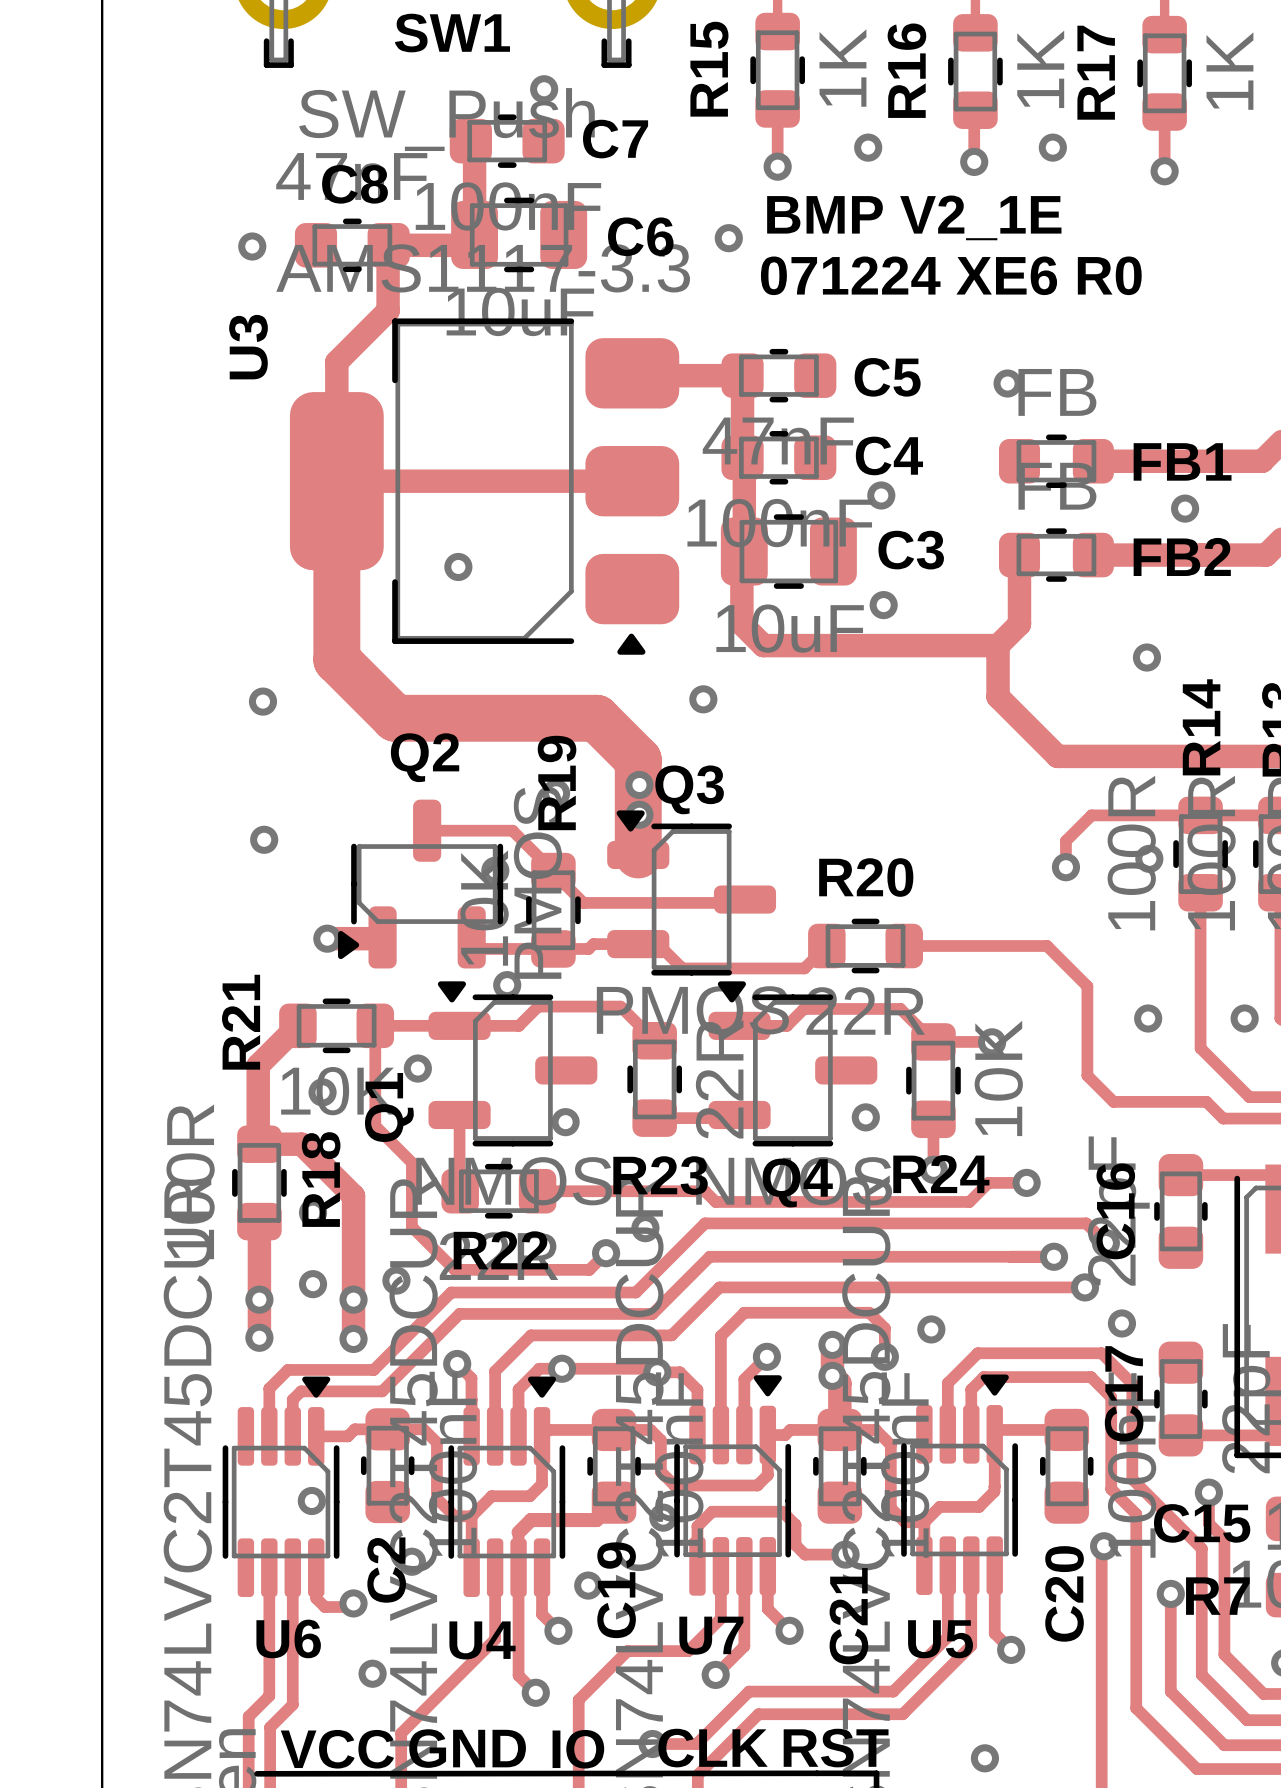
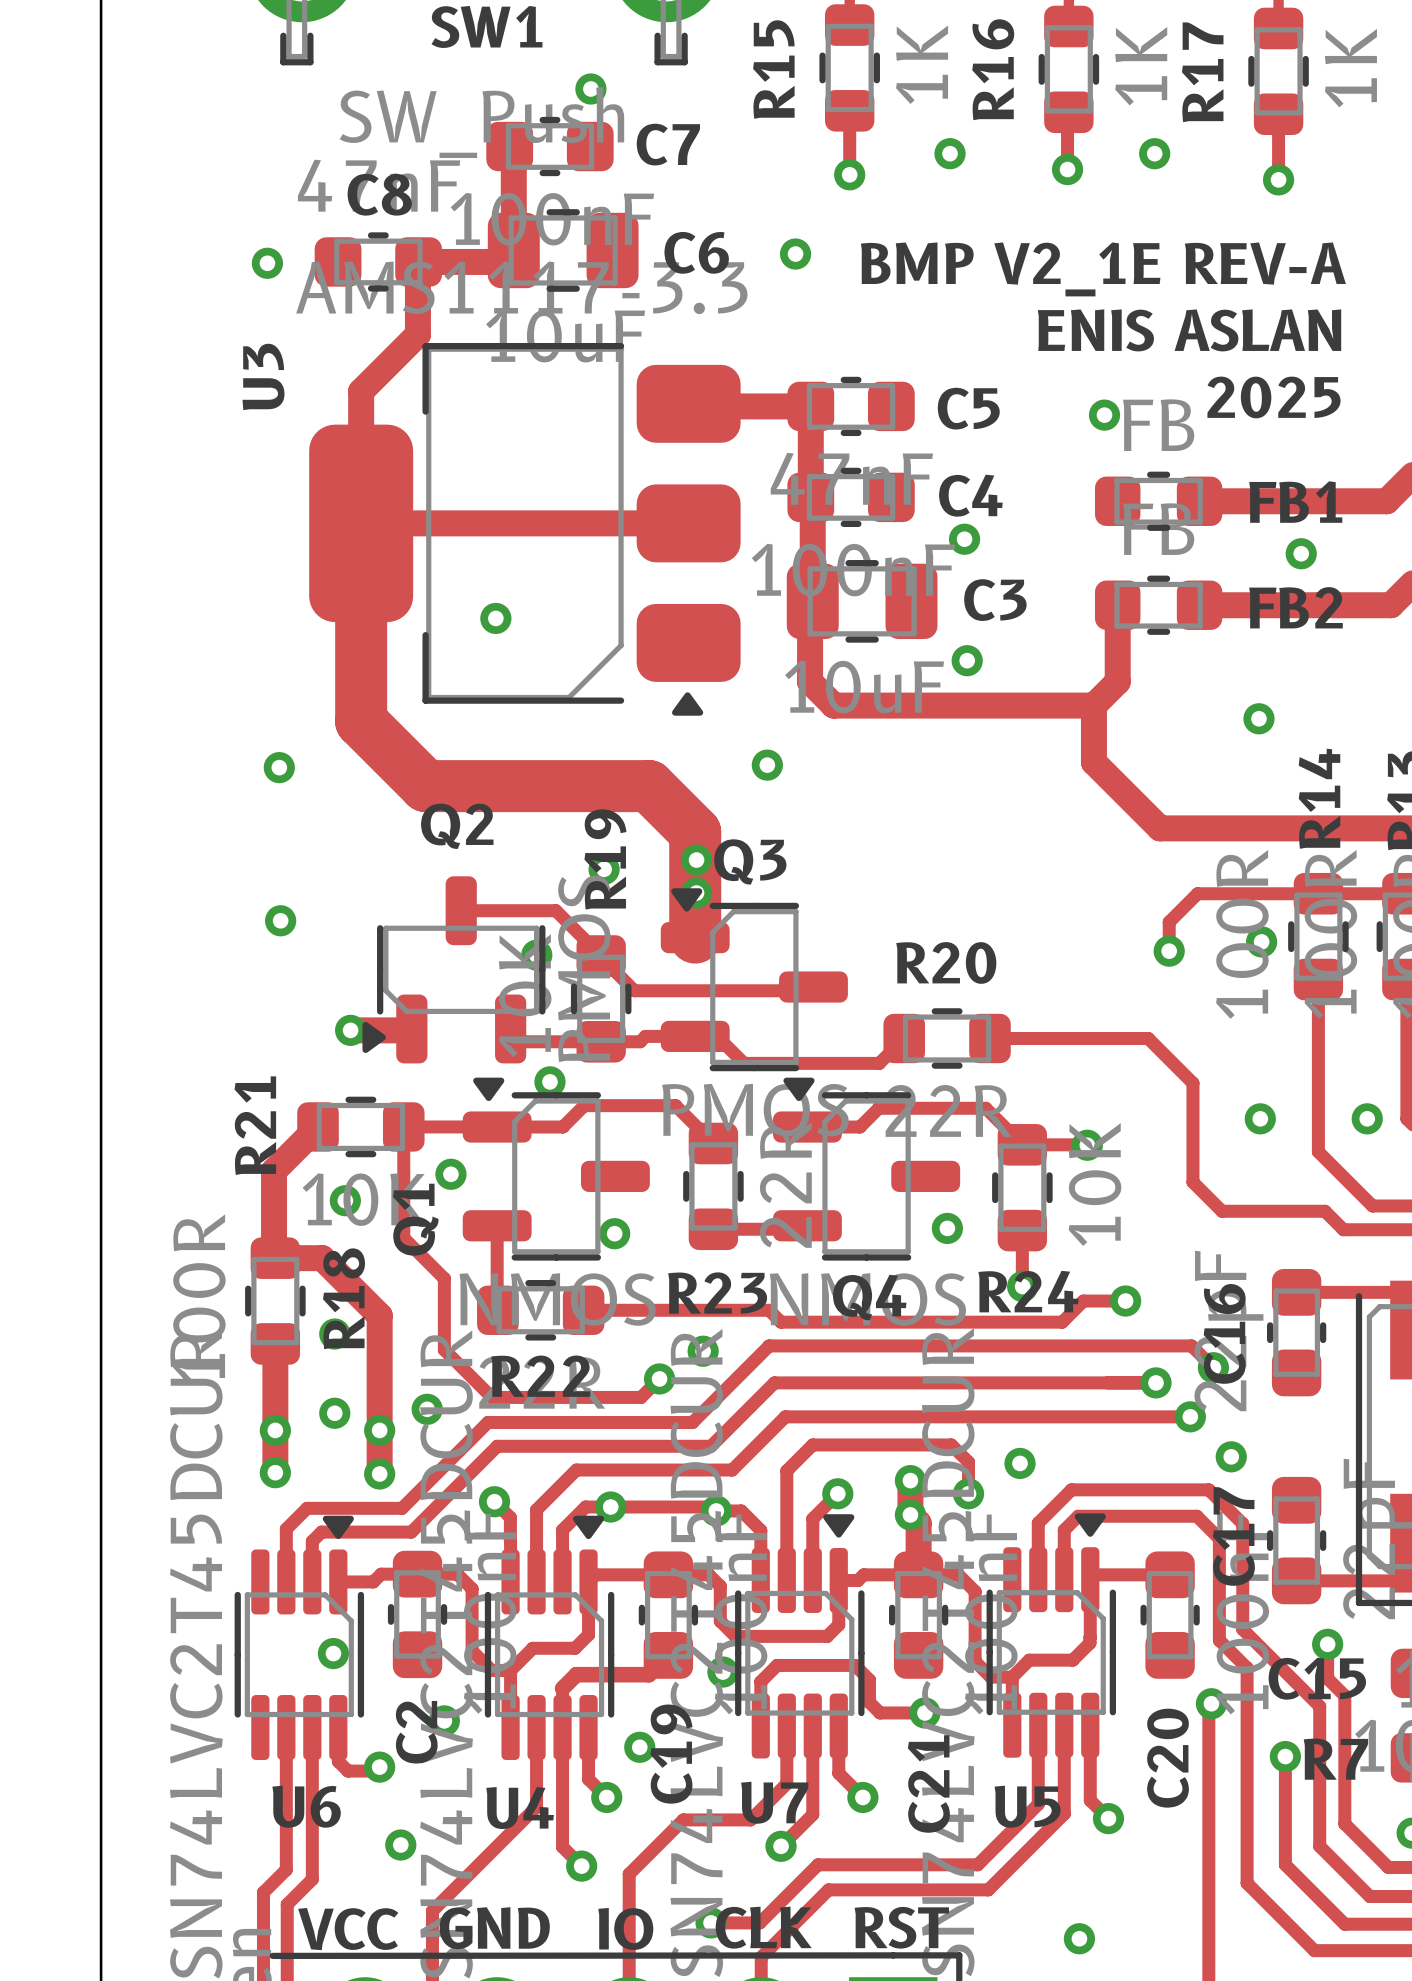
text: BMP V2_1E (914, 217) -> BMP V2_1E REV-A (1103, 269)
text: 071224 XE6 R0 (951, 275) -> none
text: none -> ENIS ASLAN (1189, 330)
text: none -> 2025 (1274, 397)

